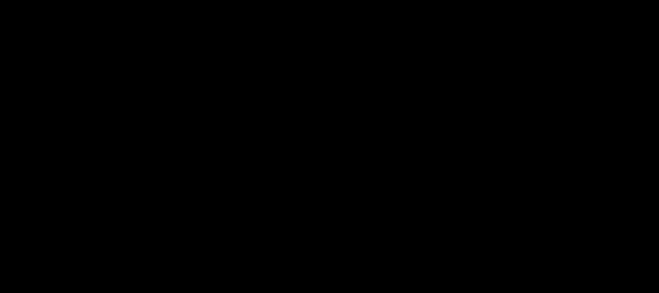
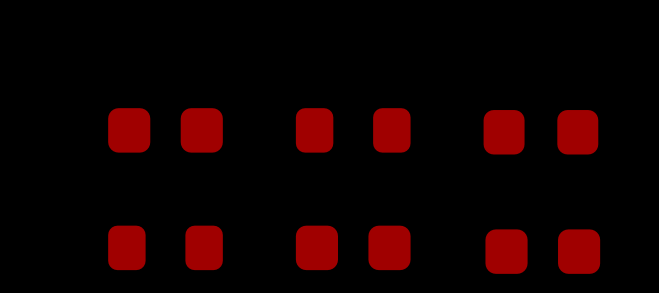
part: none -> (165, 130)
part: none -> (353, 130)
part: none -> (540, 132)
part: none -> (165, 247)
part: none -> (353, 247)
part: none -> (542, 251)

